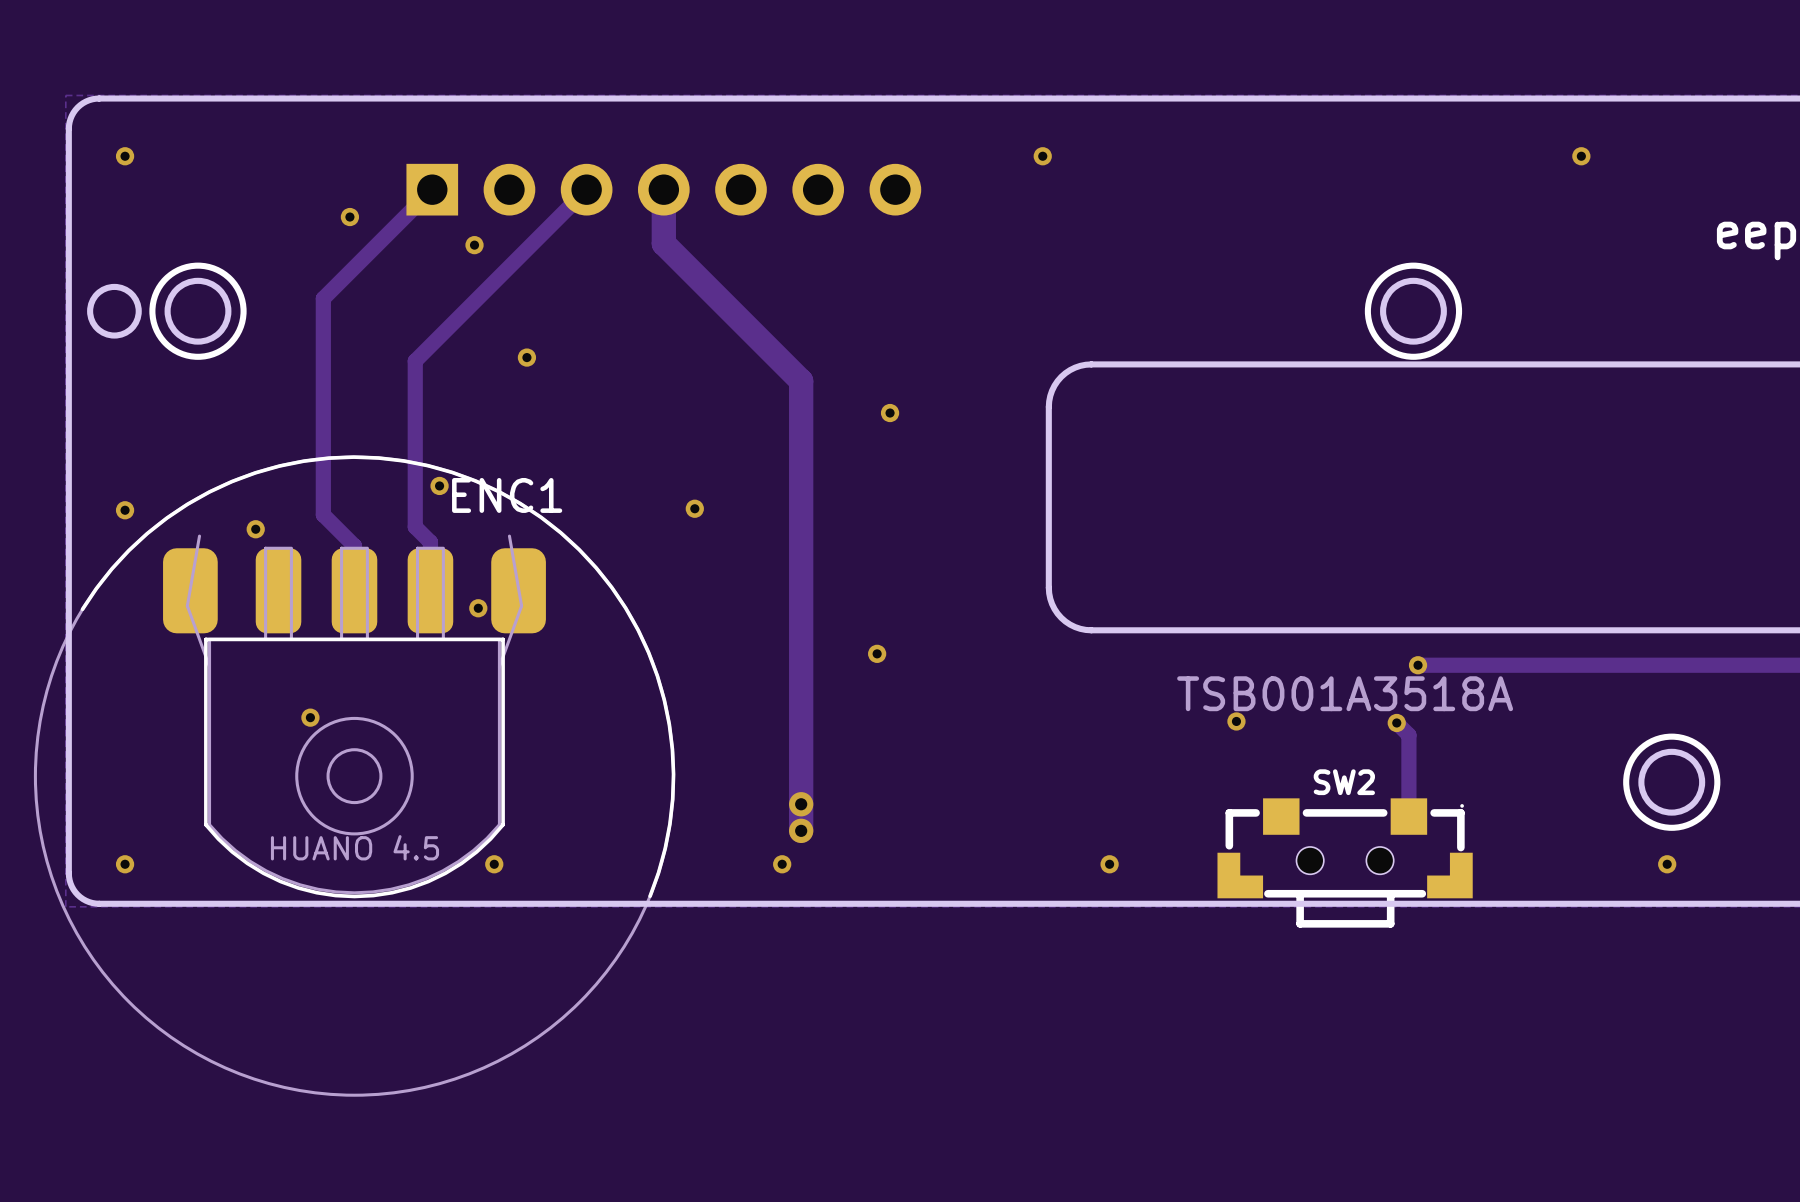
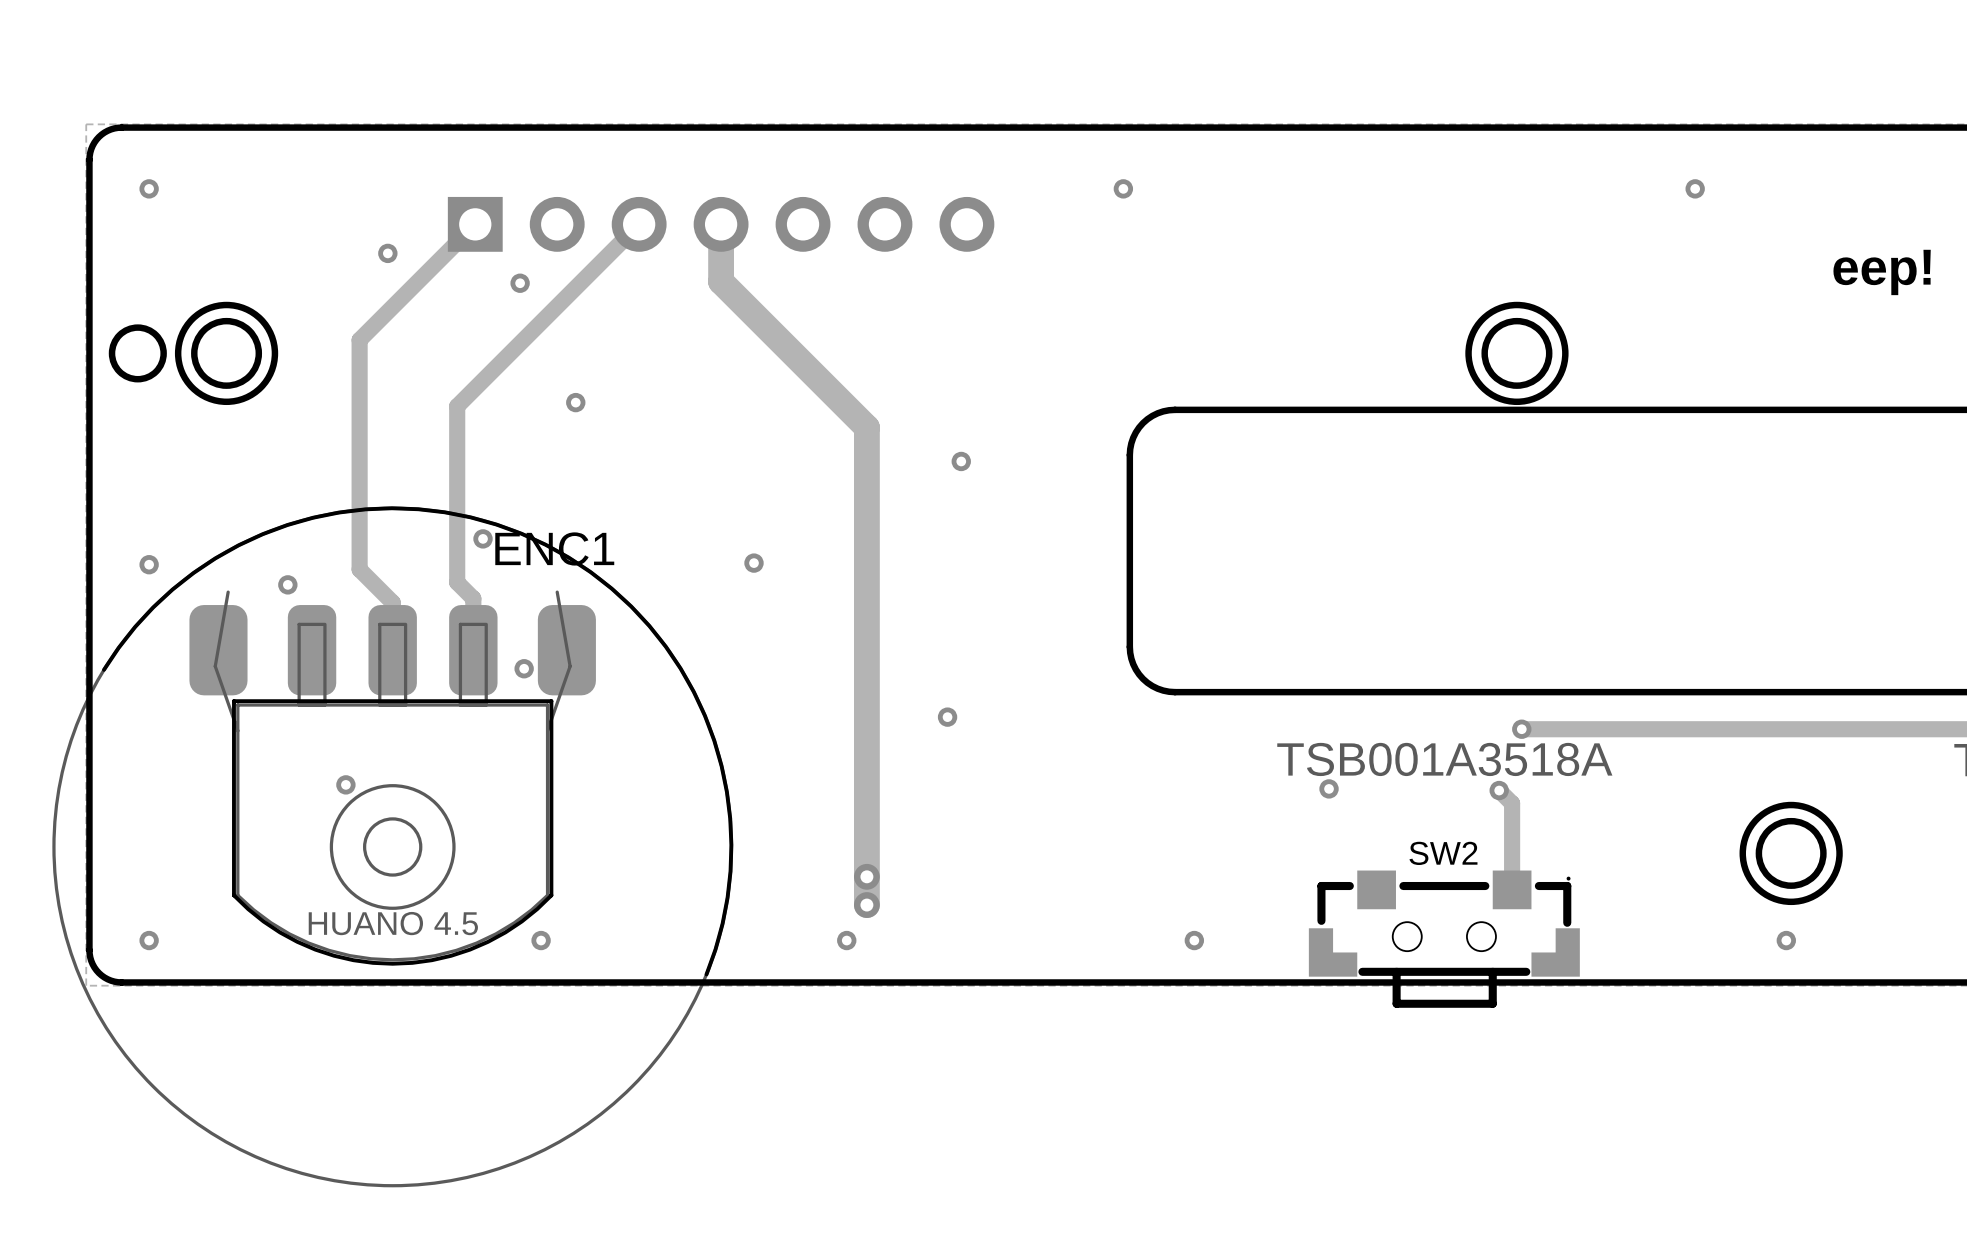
ENC1 footprint: [33, 455, 676, 1097] -> [52, 506, 734, 1188]

